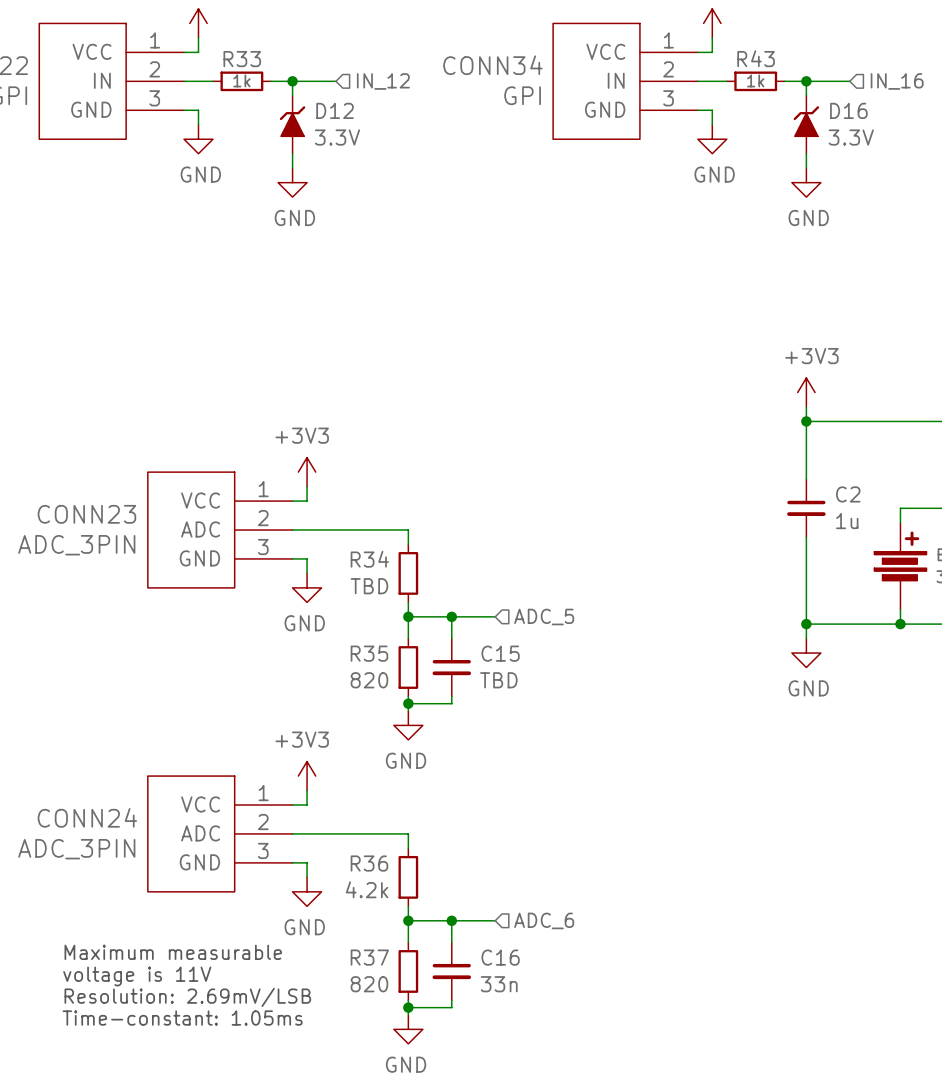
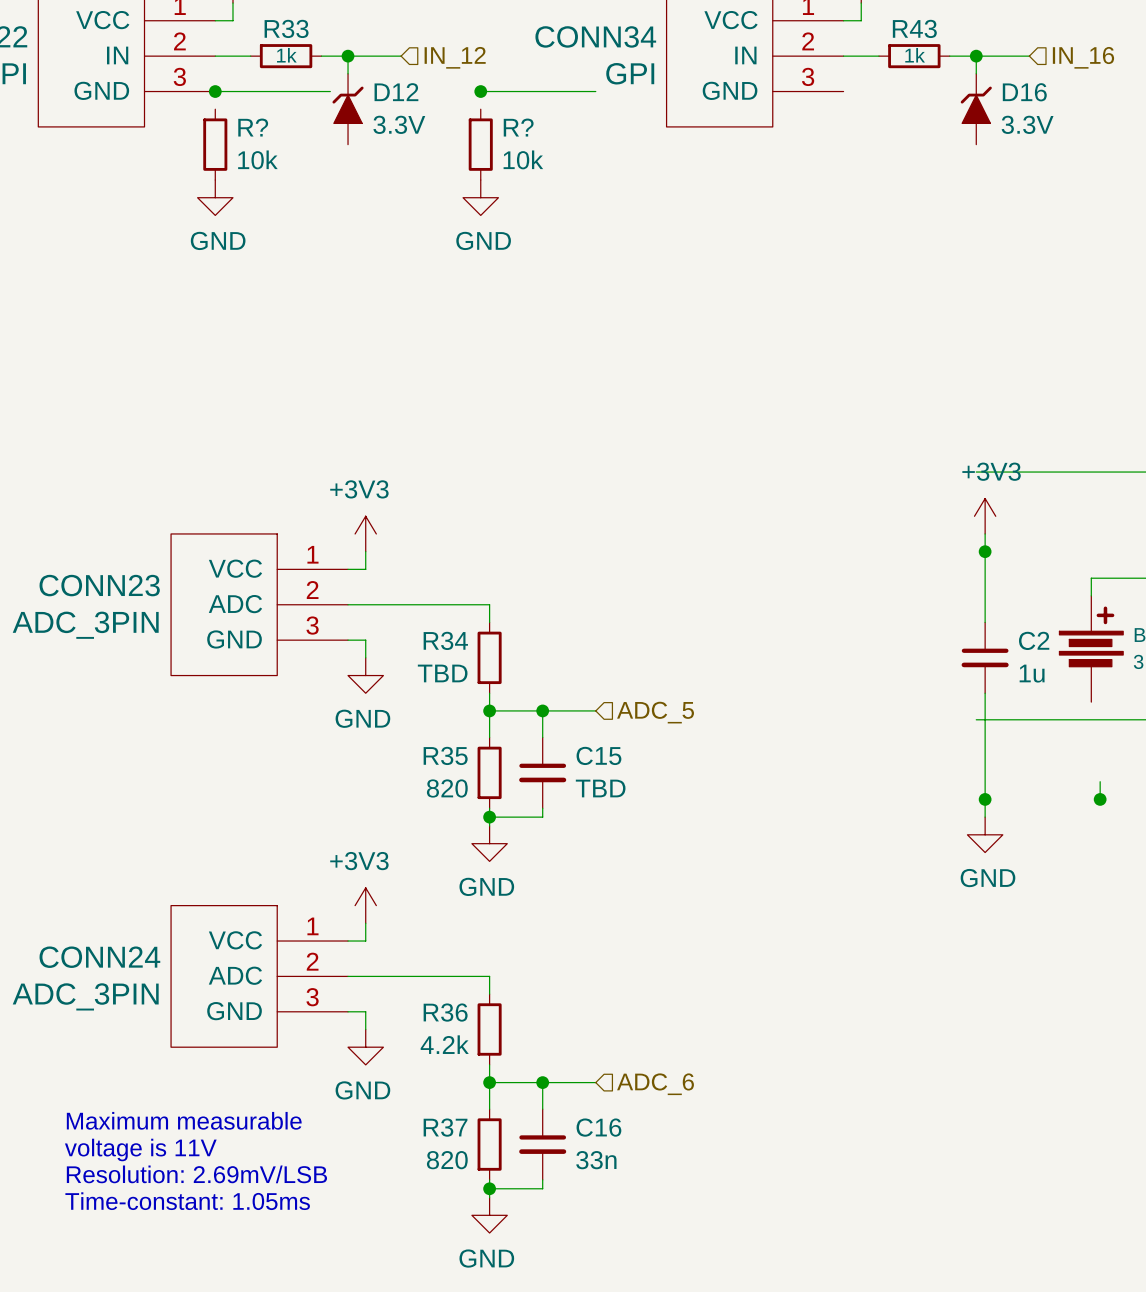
junction: none -> (215, 91)
wire: (198, 110) (198, 124) -> (232, 91) (330, 91)
wire: none -> (480, 91) (595, 91)
junction: none -> (480, 91)
wire: (697, 110) (712, 110) (712, 124) -> none
power symbol: GND (198, 139) -> none
power symbol: GND (712, 139) -> none
R?: none -> 10k (215, 144)
wire: (292, 153) (292, 168) -> none
R?: none -> 10k (480, 144)
wire: (806, 153) (806, 168) -> none
power symbol: GND (292, 182) -> none
power symbol: GND (806, 182) -> none
power symbol: none -> GND (215, 197)
power symbol: none -> GND (480, 197)
power symbol position: +3V3 (806, 392) -> +3V3 (985, 516)
wire: (806, 406) (806, 479) -> (985, 533) (985, 622)
junction position: (806, 421) -> (985, 551)
C2 position: (806, 508) -> (985, 657)
wire: (806, 537) (806, 638) -> (985, 693) (985, 817)
wire: (900, 609) (900, 624) -> (1100, 781) (1100, 799)
junction: (806, 624) -> none
junction: (900, 624) -> none
power symbol position: GND (806, 653) -> GND (985, 834)
junction: none -> (985, 799)
junction: none -> (1100, 799)

